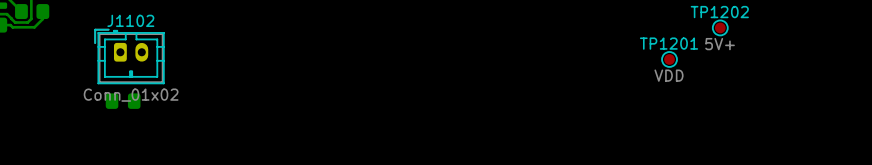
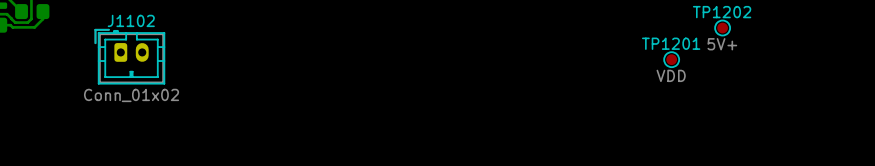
part: (123, 101) -> none

